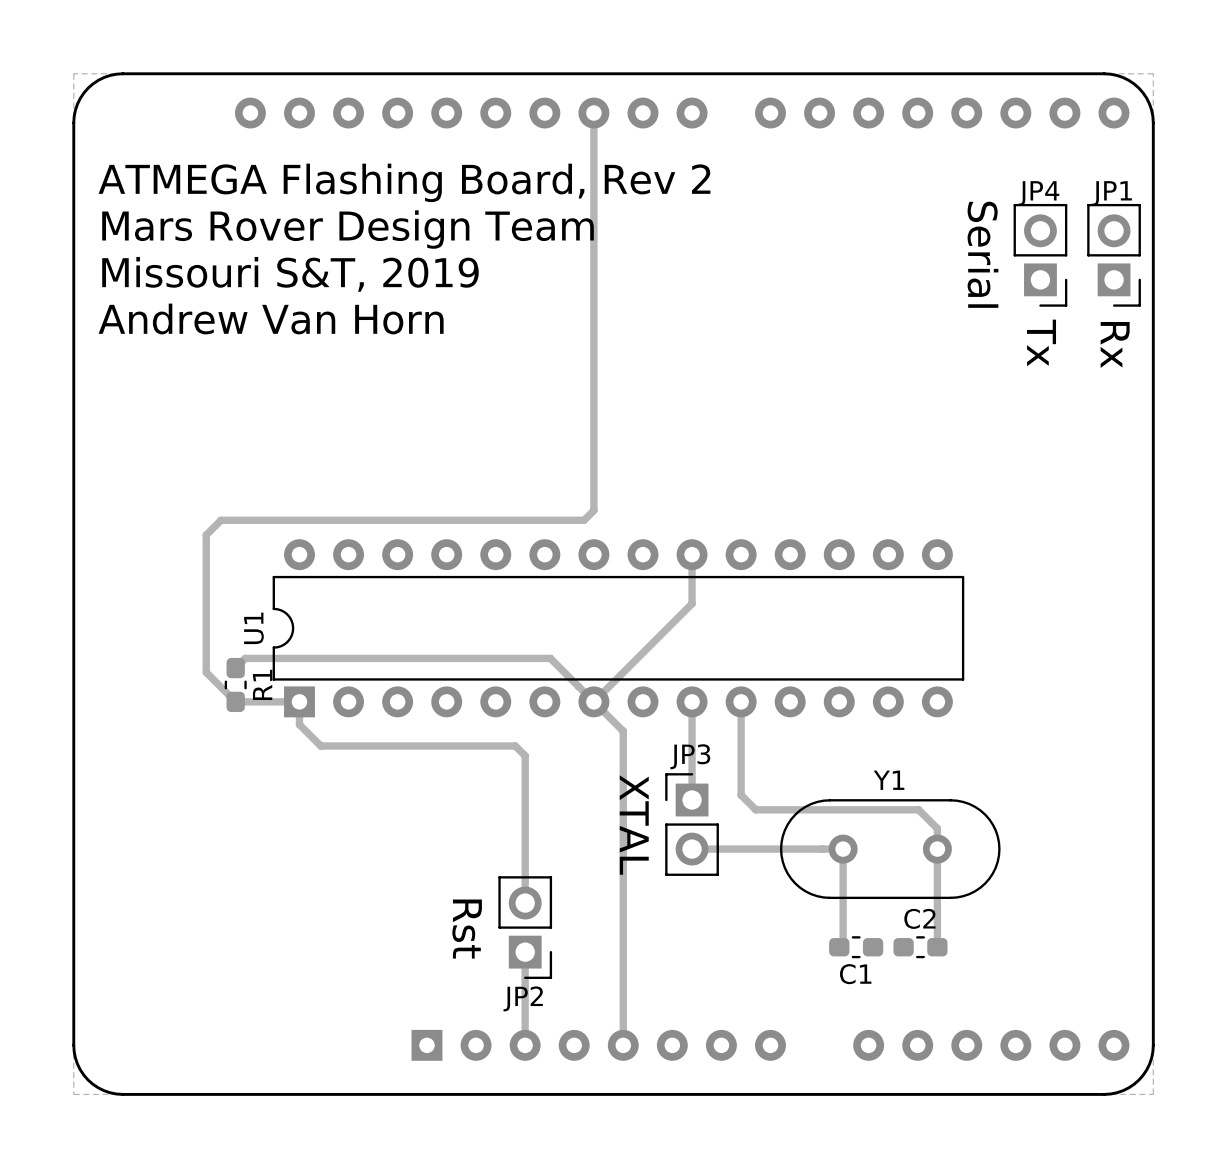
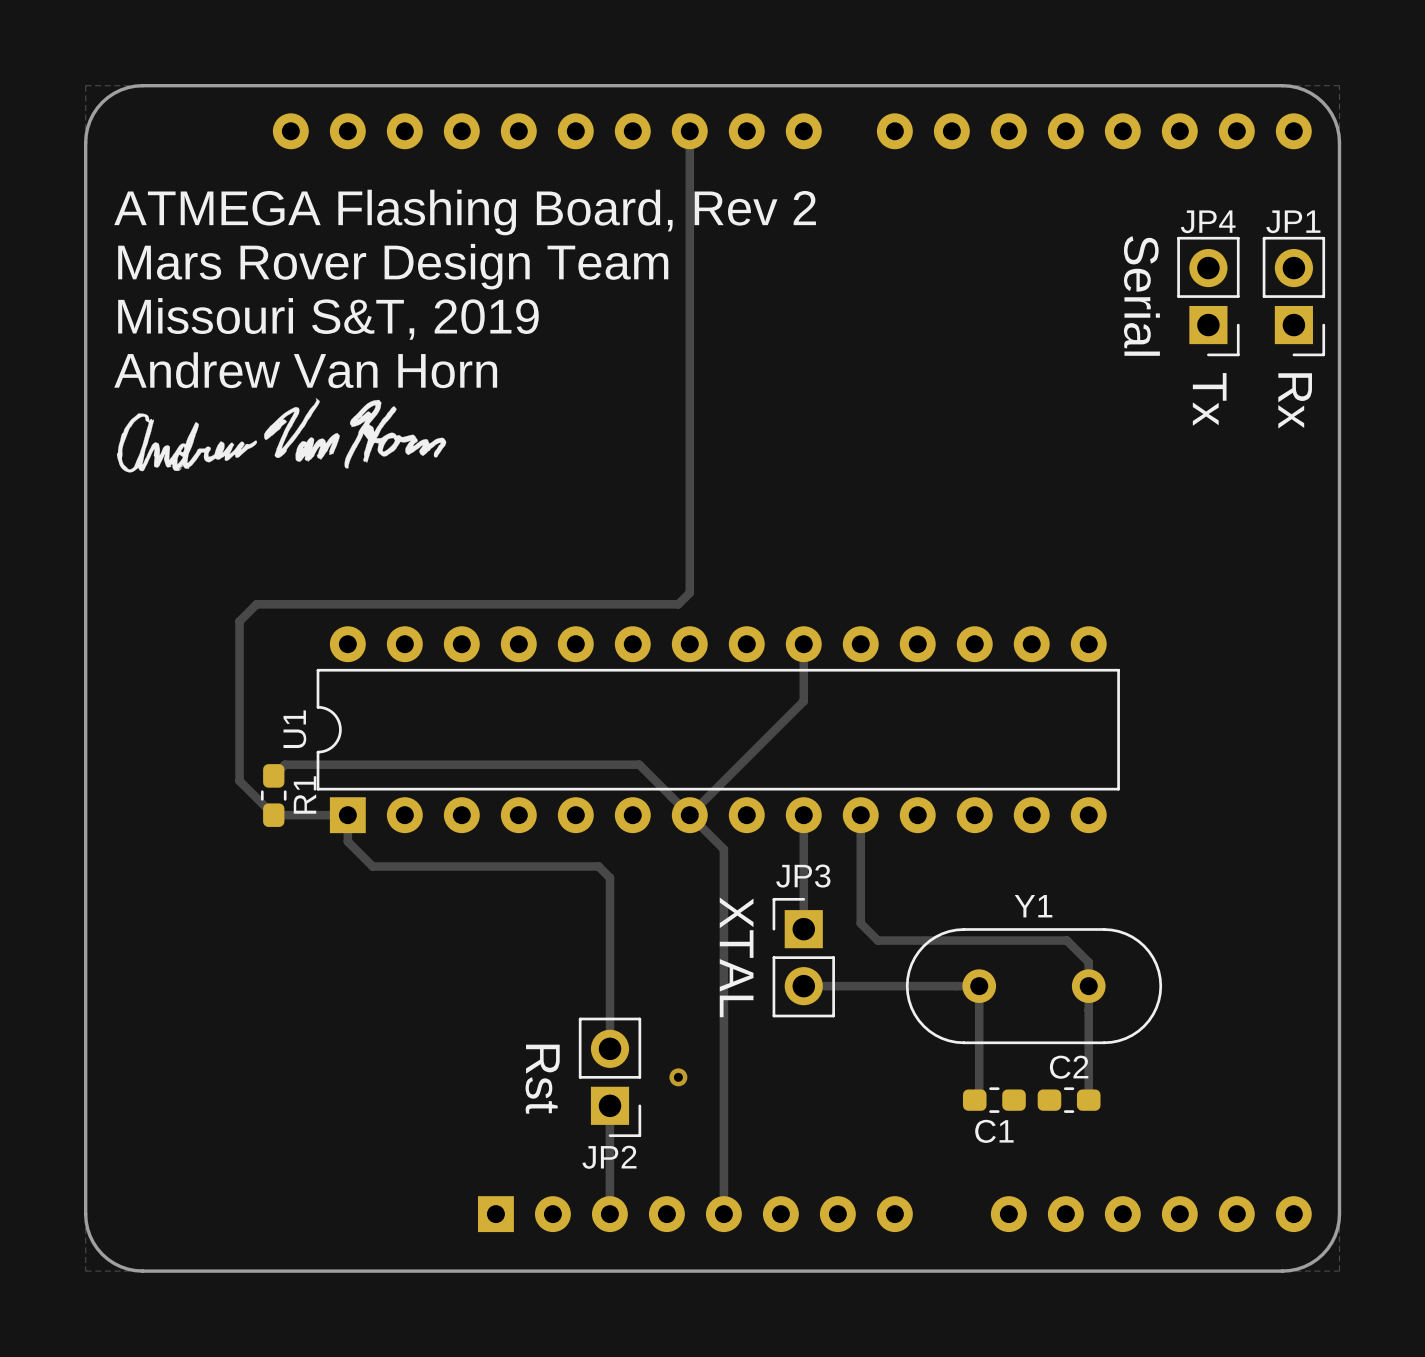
drawing: none -> [116, 398, 447, 473]
via: none -> (678, 1077)

